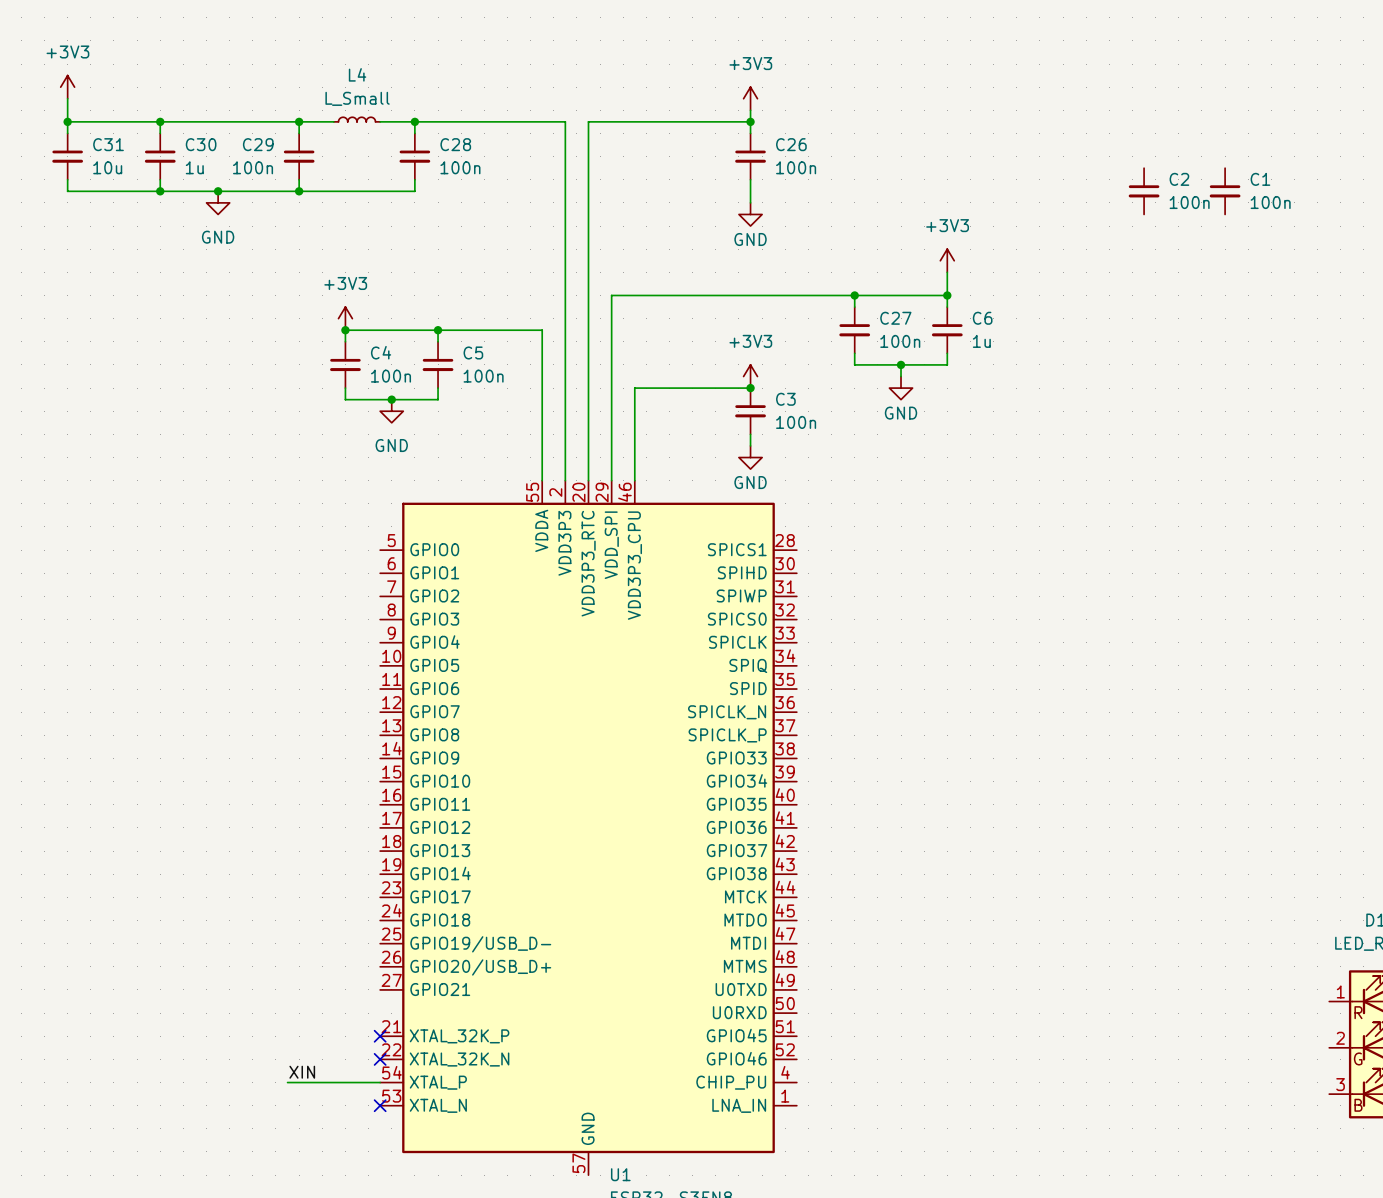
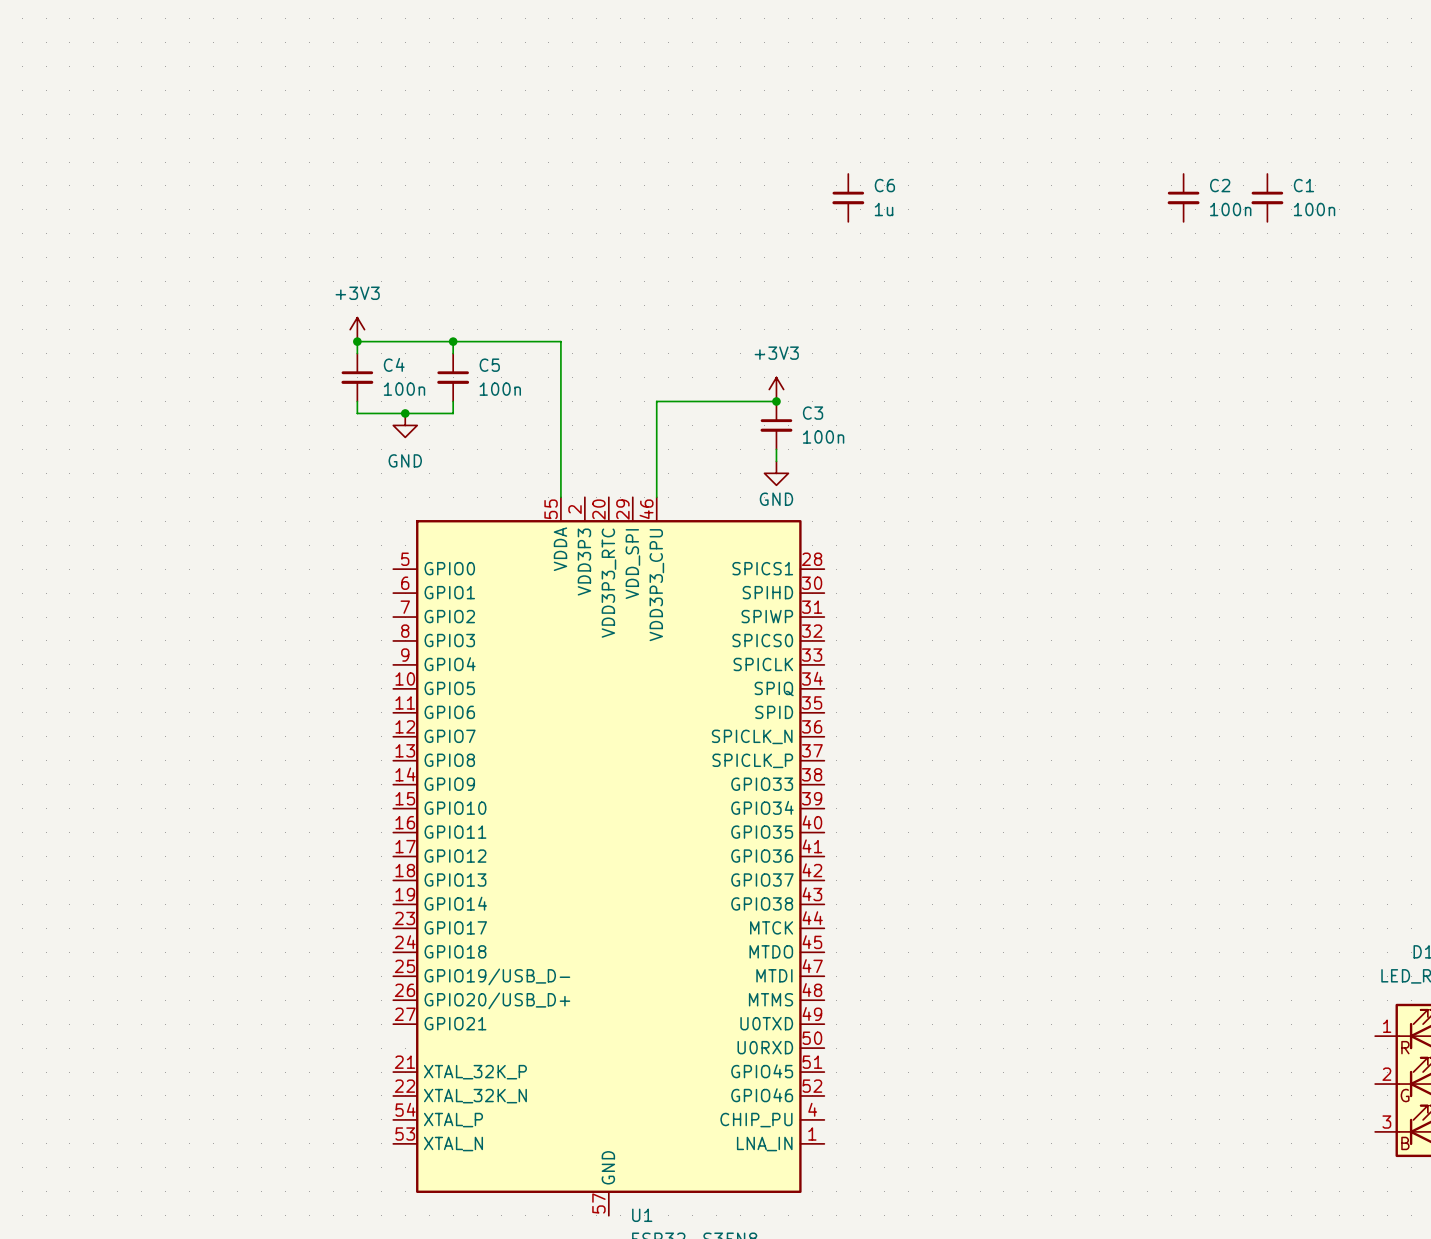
power symbol: +3V3 (67, 87) -> none
wire: (67, 98) (67, 133) -> none
power symbol: +3V3 (750, 98) -> none
wire: (750, 110) (750, 133) -> none
L4: L_Small (357, 119) -> none
wire: (67, 121) (333, 121) -> none
junction: (67, 121) -> none
wire: (160, 121) (160, 133) -> none
junction: (160, 121) -> none
wire: (299, 121) (299, 133) -> none
junction: (299, 121) -> none
wire: (380, 121) (565, 121) (565, 480) -> none
wire: (414, 121) (414, 133) -> none
junction: (414, 121) -> none
wire: (750, 121) (588, 121) (588, 480) -> none
junction: (750, 121) -> none
C31: 10u (67, 156) -> none
C30: 1u (160, 156) -> none
C29: 100n (299, 156) -> none
C28: 100n (414, 156) -> none
C26: 100n (750, 156) -> none
wire: (67, 179) (67, 191) (414, 191) (414, 179) -> none
wire: (160, 179) (160, 191) -> none
wire: (299, 179) (299, 191) -> none
wire: (750, 179) (750, 202) -> none
junction: (160, 191) -> none
junction: (218, 191) -> none
junction: (299, 191) -> none
power symbol: GND (218, 202) -> none
power symbol: GND (750, 214) -> none
power symbol: +3V3 (947, 260) -> none
wire: (947, 272) (947, 307) -> none
wire: (854, 295) (854, 307) -> none
junction: (854, 295) -> none
wire: (947, 295) (611, 295) (611, 480) -> none
junction: (947, 295) -> none
C27: 100n (854, 330) -> none
C6 position: (947, 330) -> (848, 197)
wire: (854, 353) (854, 364) (947, 364) (947, 353) -> none
wire: (901, 364) (901, 376) -> none
junction: (901, 364) -> none
power symbol: GND (901, 388) -> none
no-connect mark: (380, 1036) -> none
no-connect mark: (380, 1059) -> none
label: XIN (302, 1072) -> none
wire: (287, 1082) (380, 1082) -> none
no-connect mark: (380, 1105) -> none

